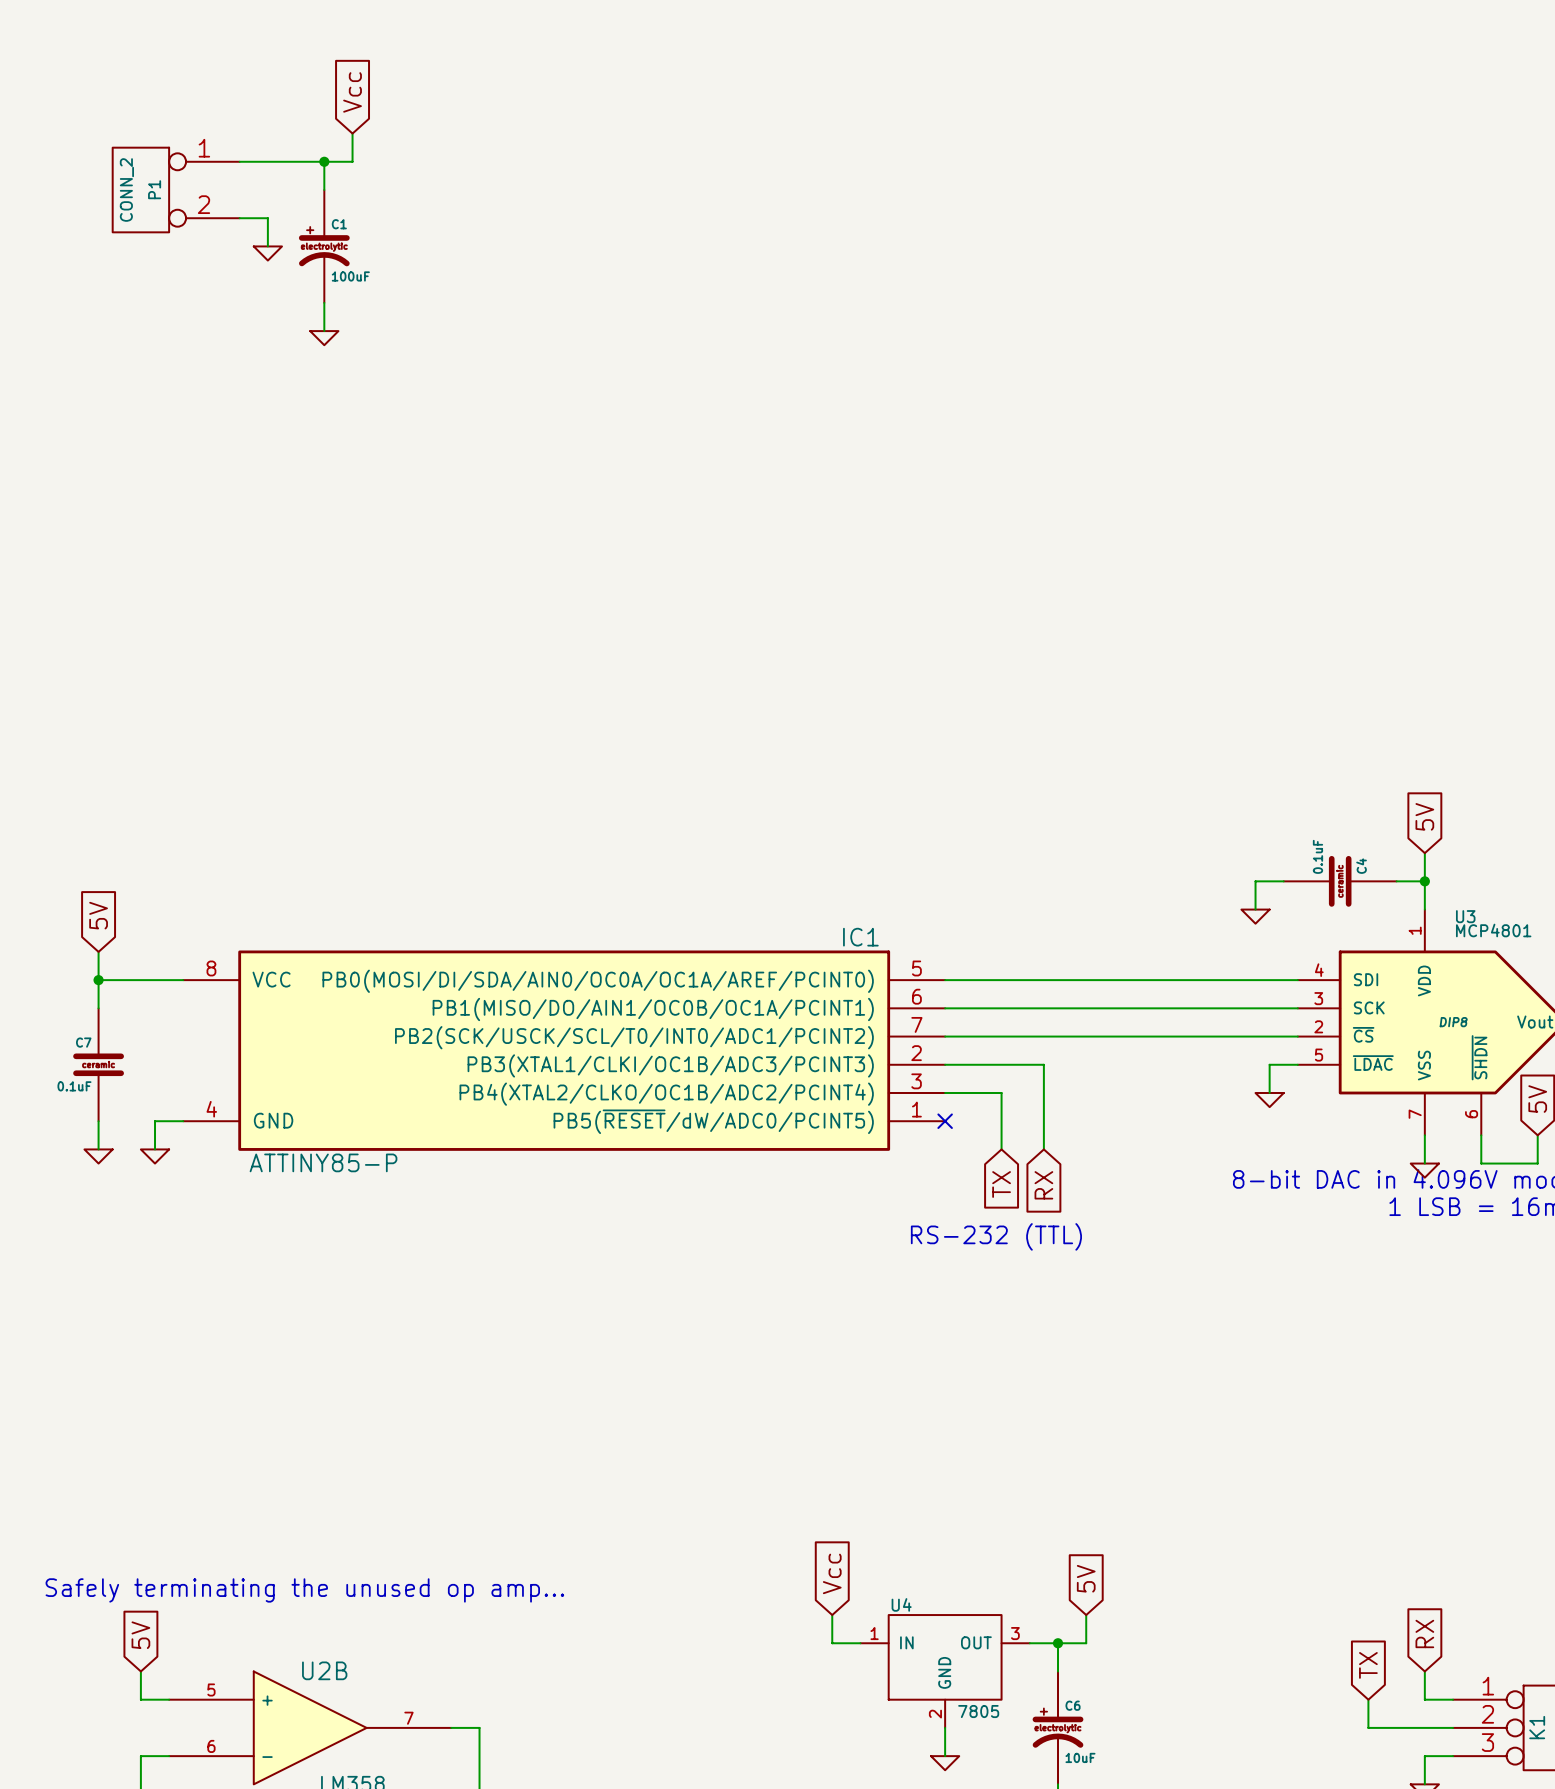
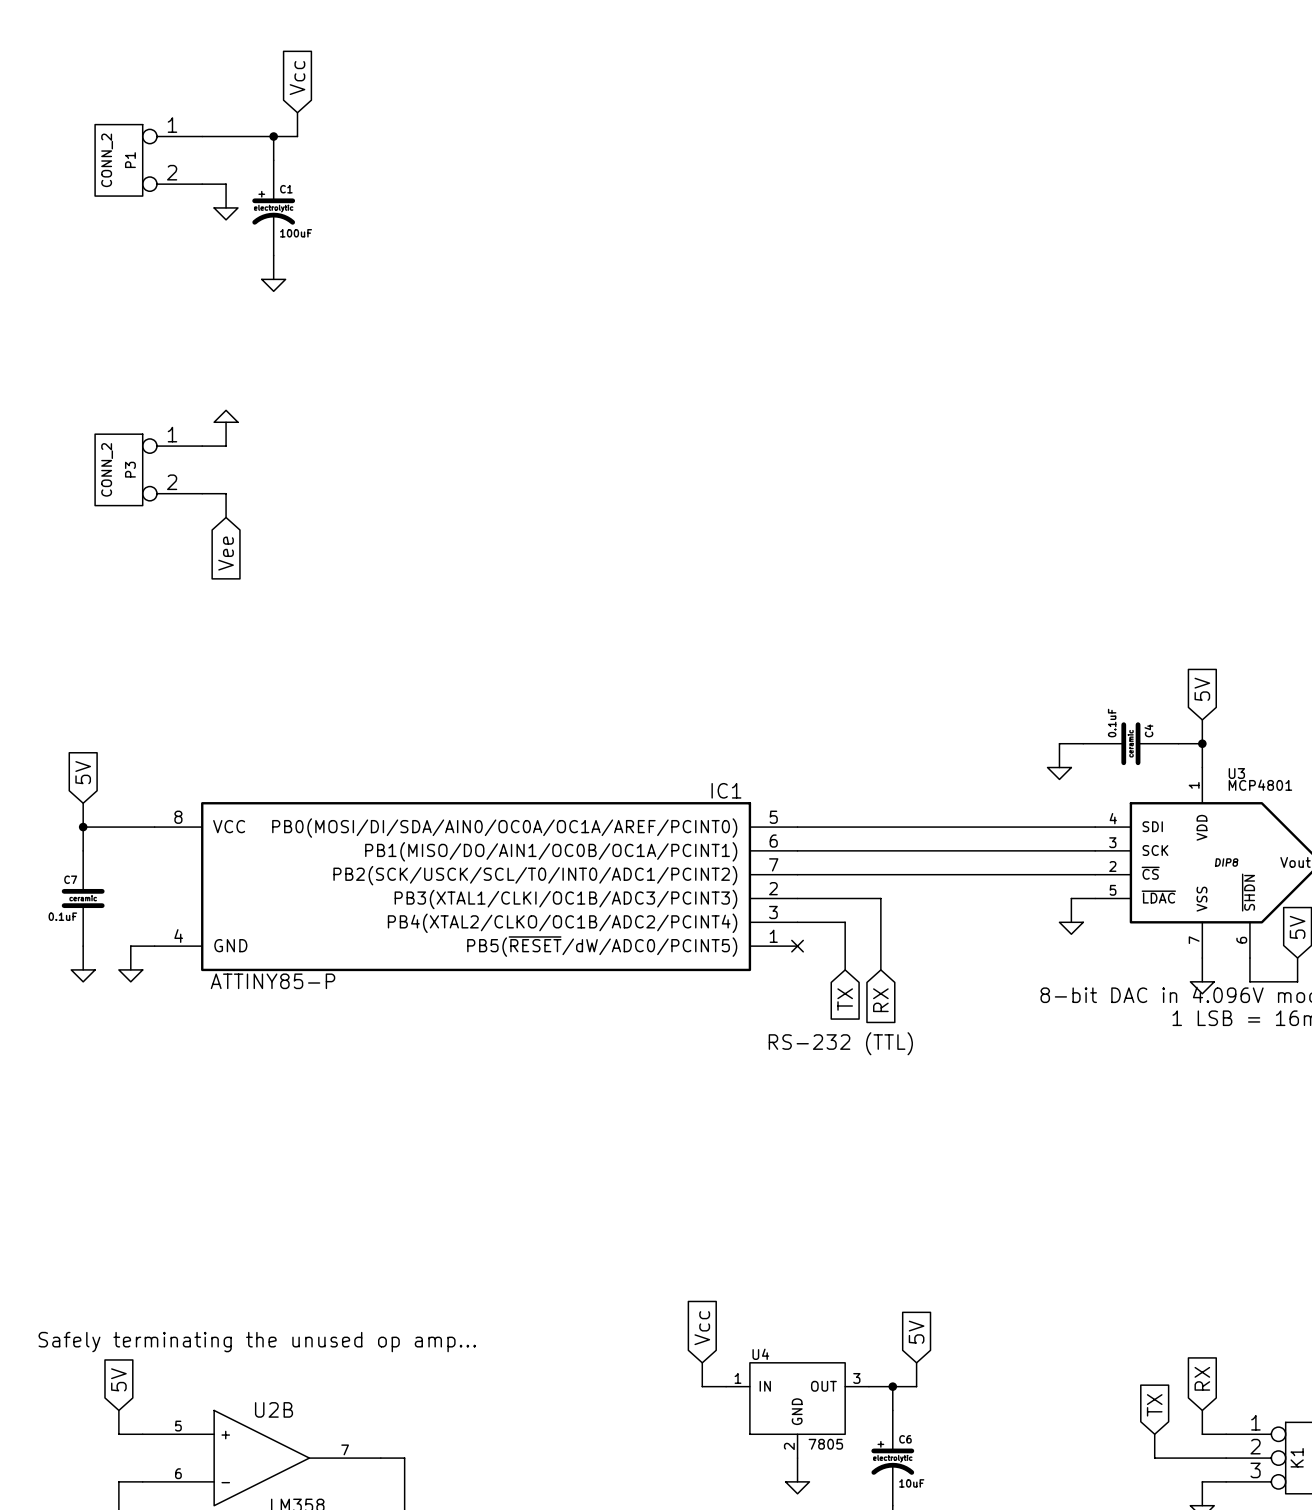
power symbol: none -> (226, 416)
wire: none -> (226, 422) (226, 446) (202, 446)
P3: none -> CONN_2 (148, 469)
wire: none -> (202, 493) (226, 493) (226, 517)
global label: none -> Vee (226, 553)

